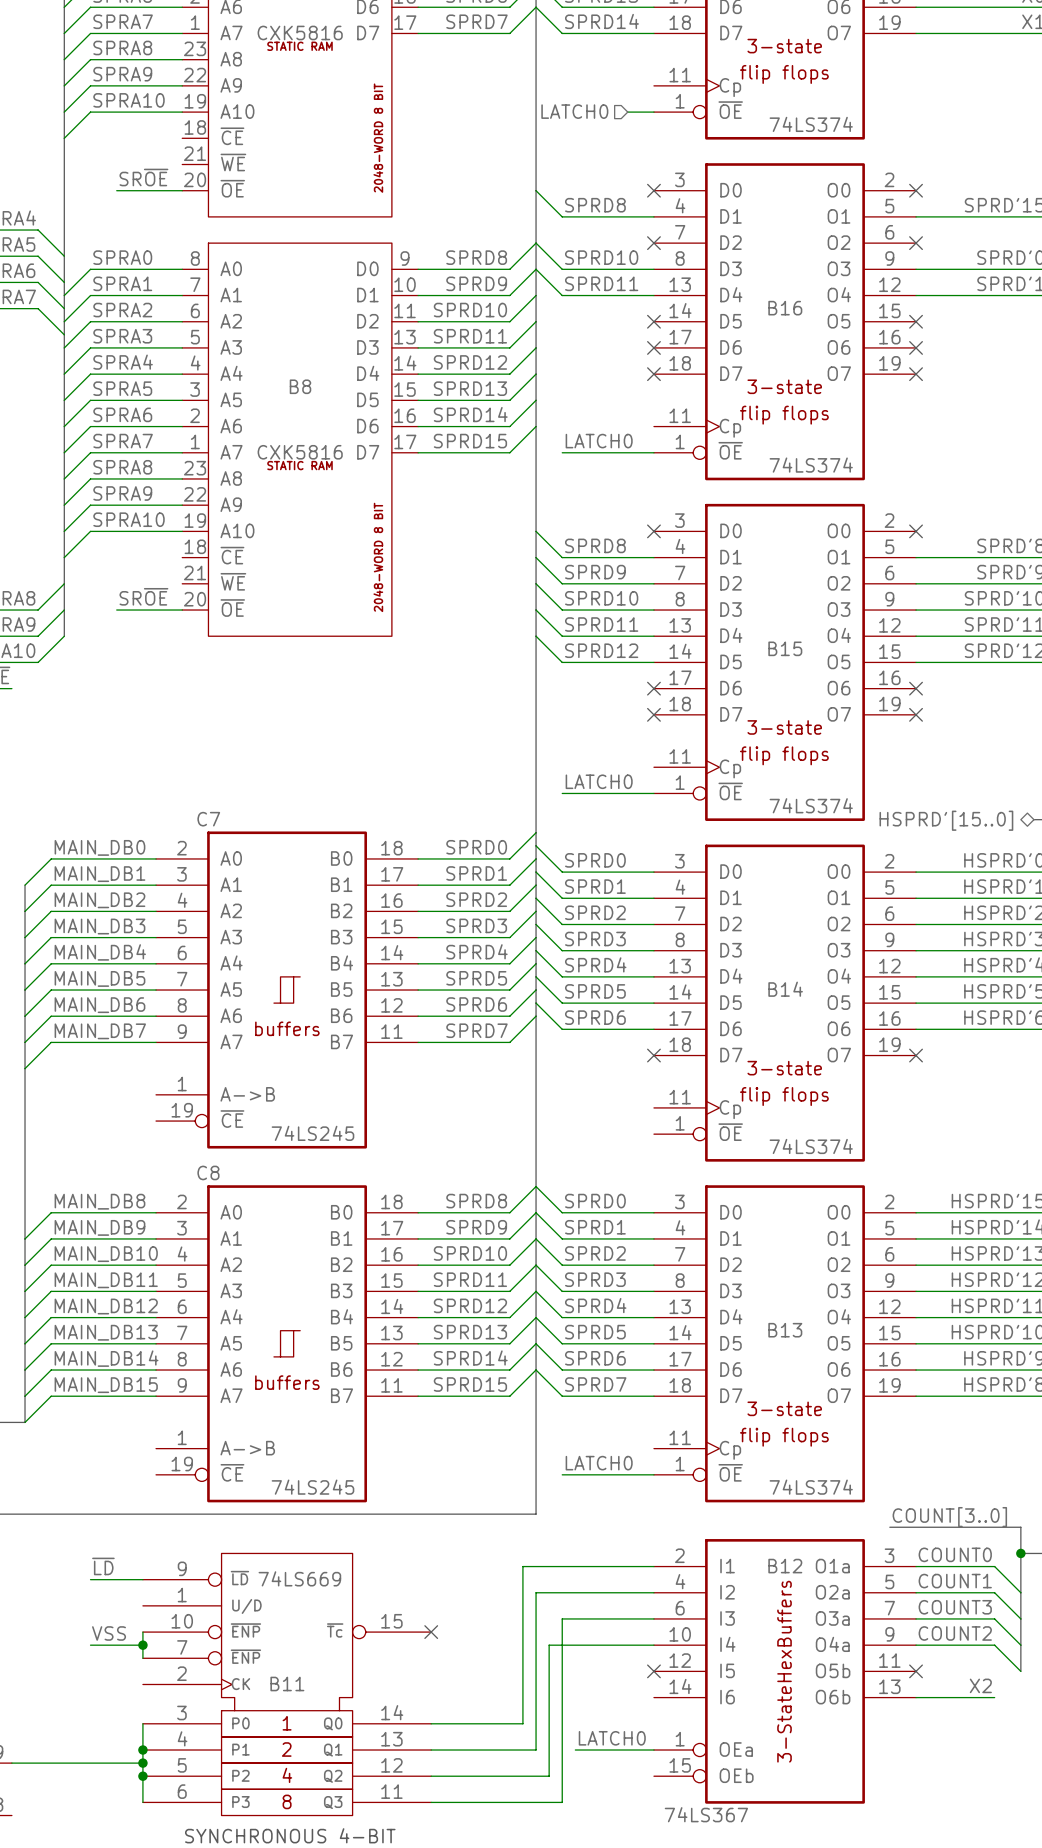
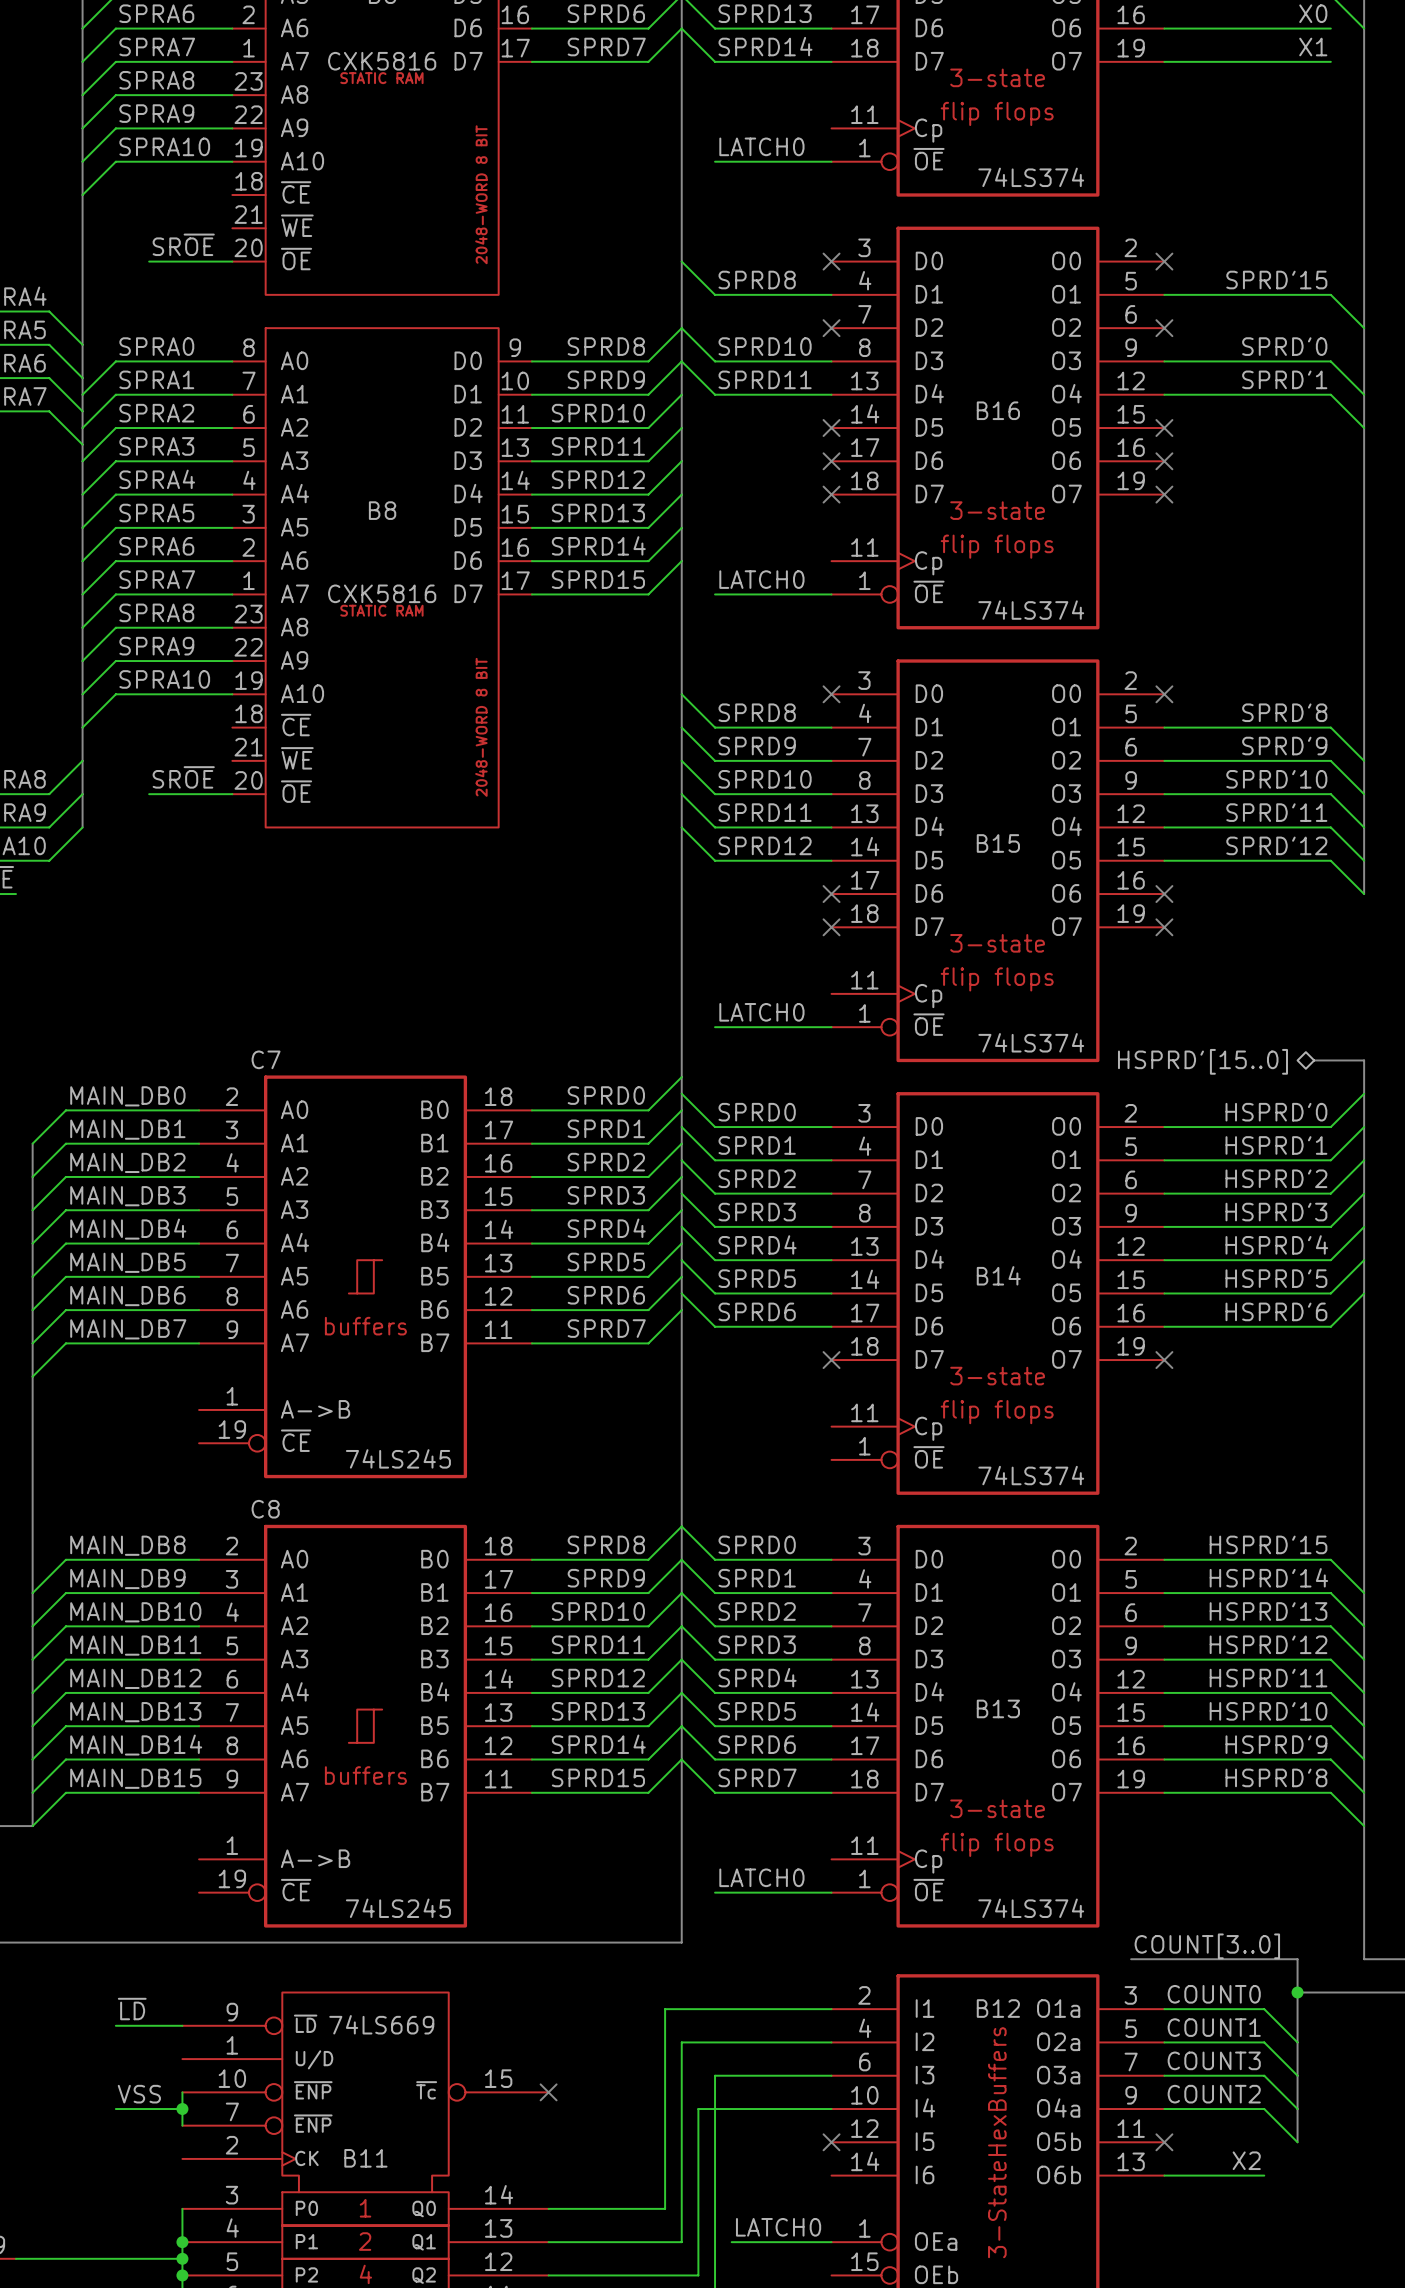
label: none -> LATCH0 (761, 146)
hierarchical label: LATCH0 (574, 111) -> none
wire: none -> (715, 161) (798, 161)

